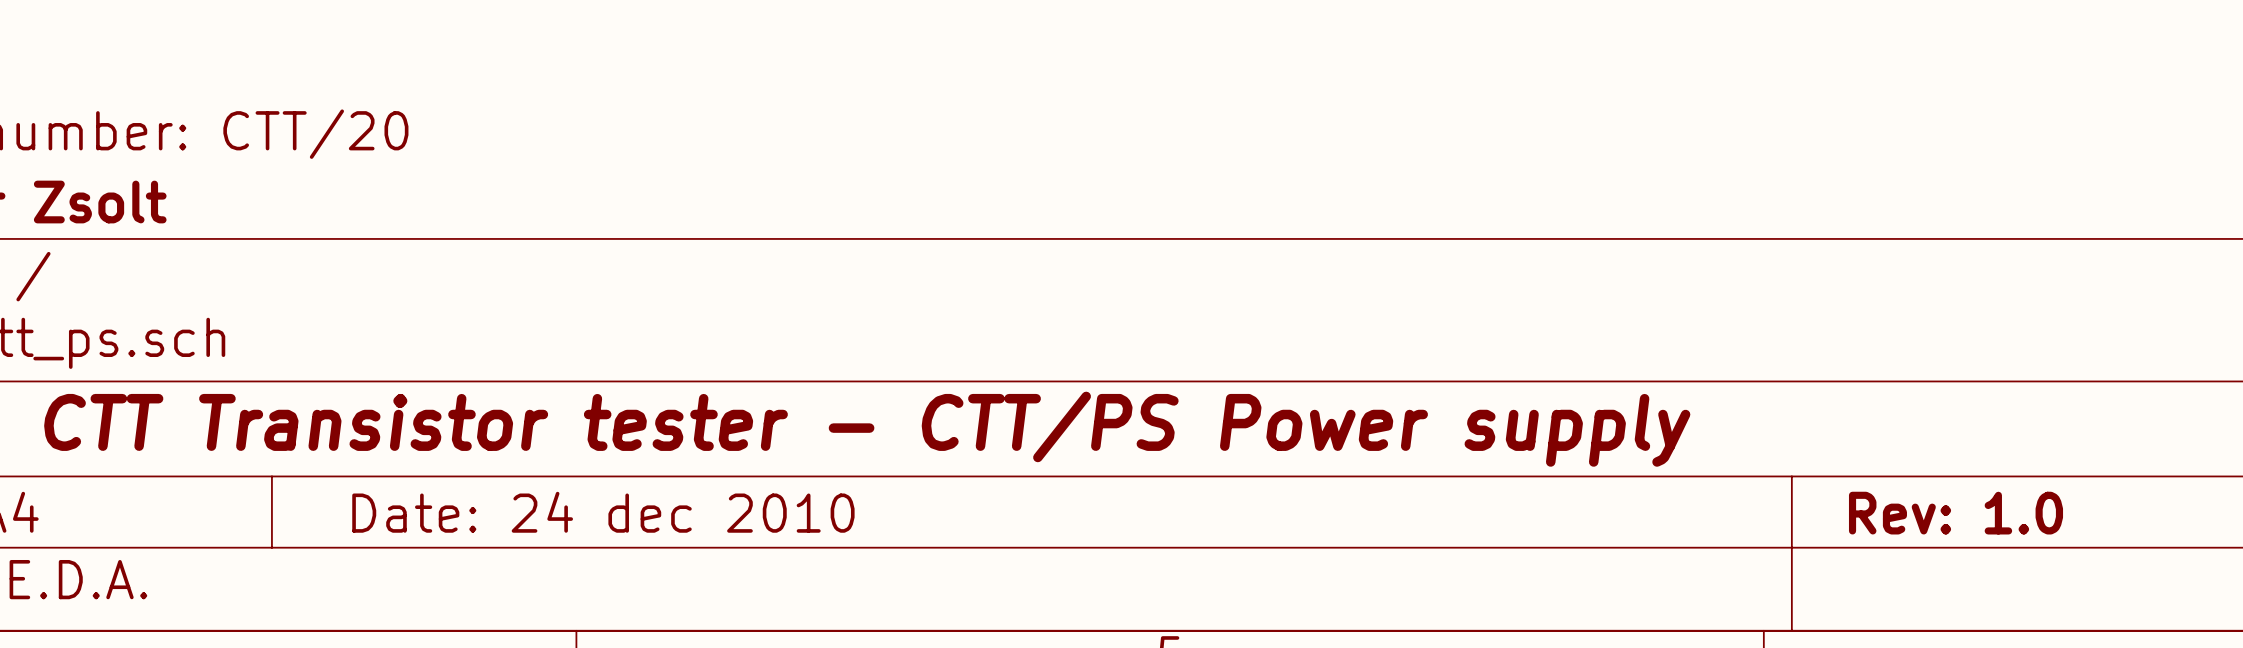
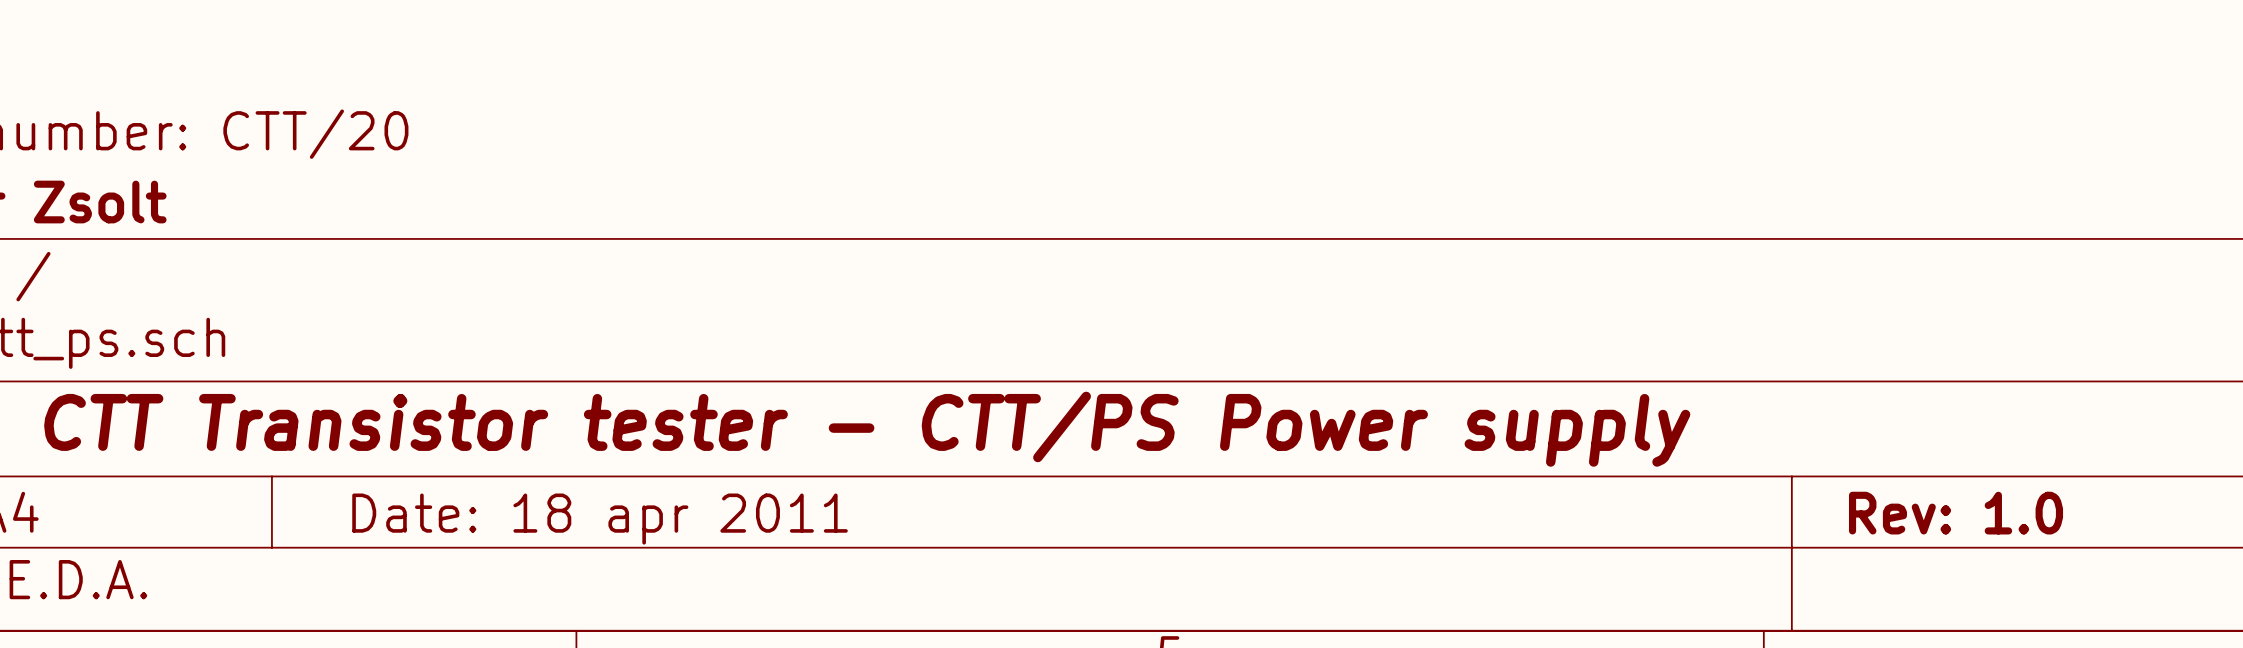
title block: Date: 24 dec 2010 (603, 512) -> Date: 18 apr 2011 (600, 519)

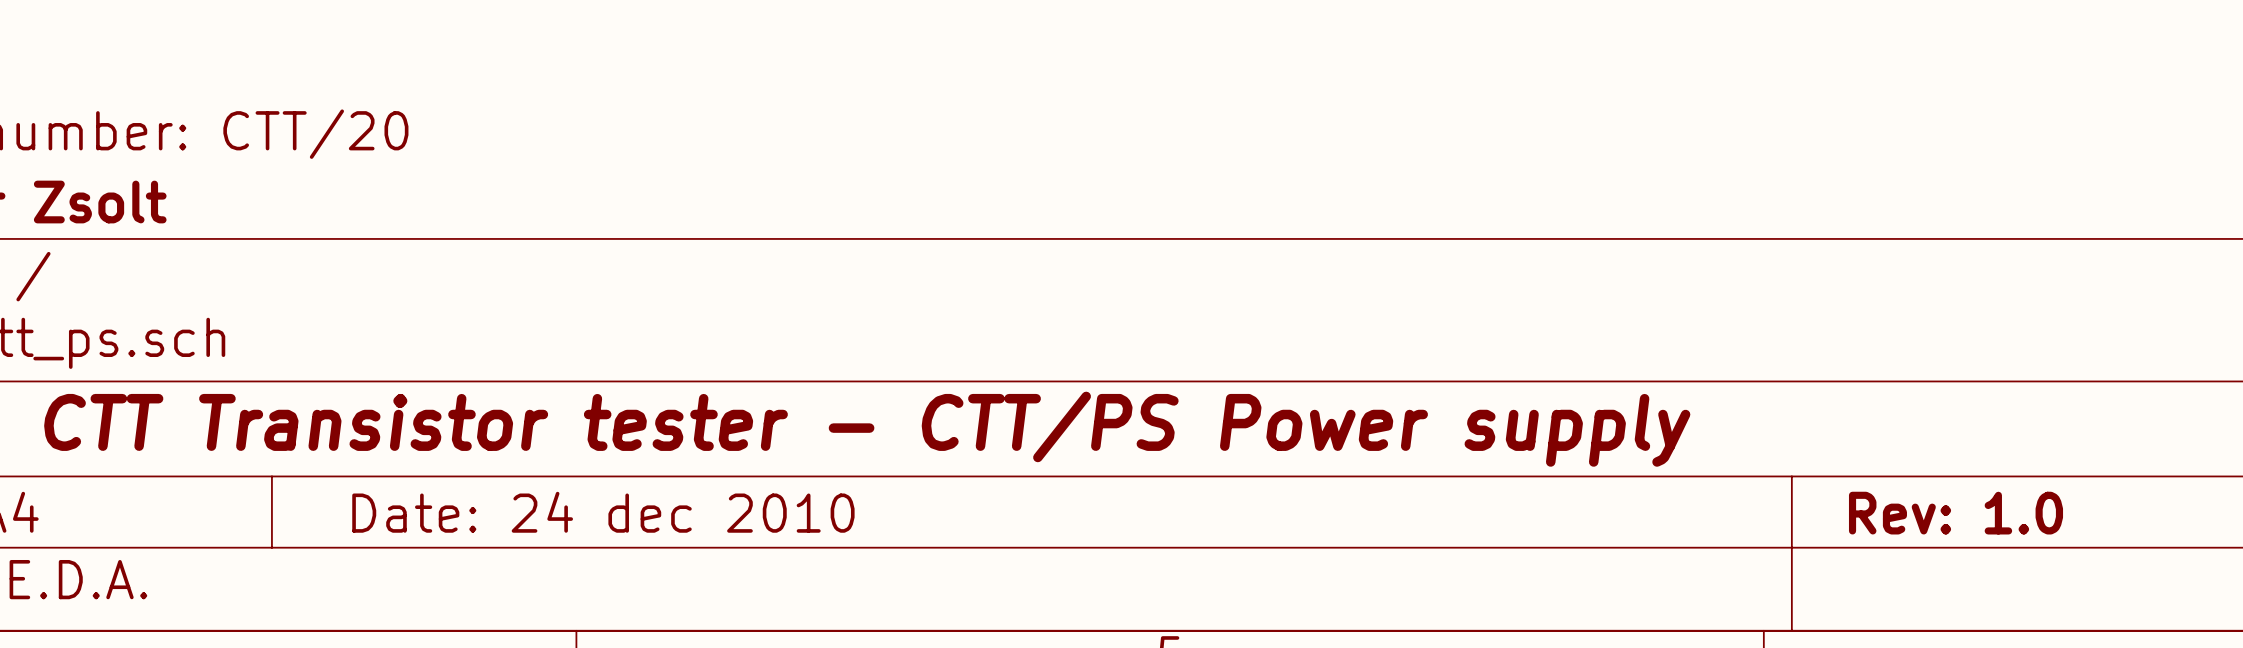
title block: Date: 18 apr 2011 (600, 519) -> Date: 24 dec 2010 (603, 512)

